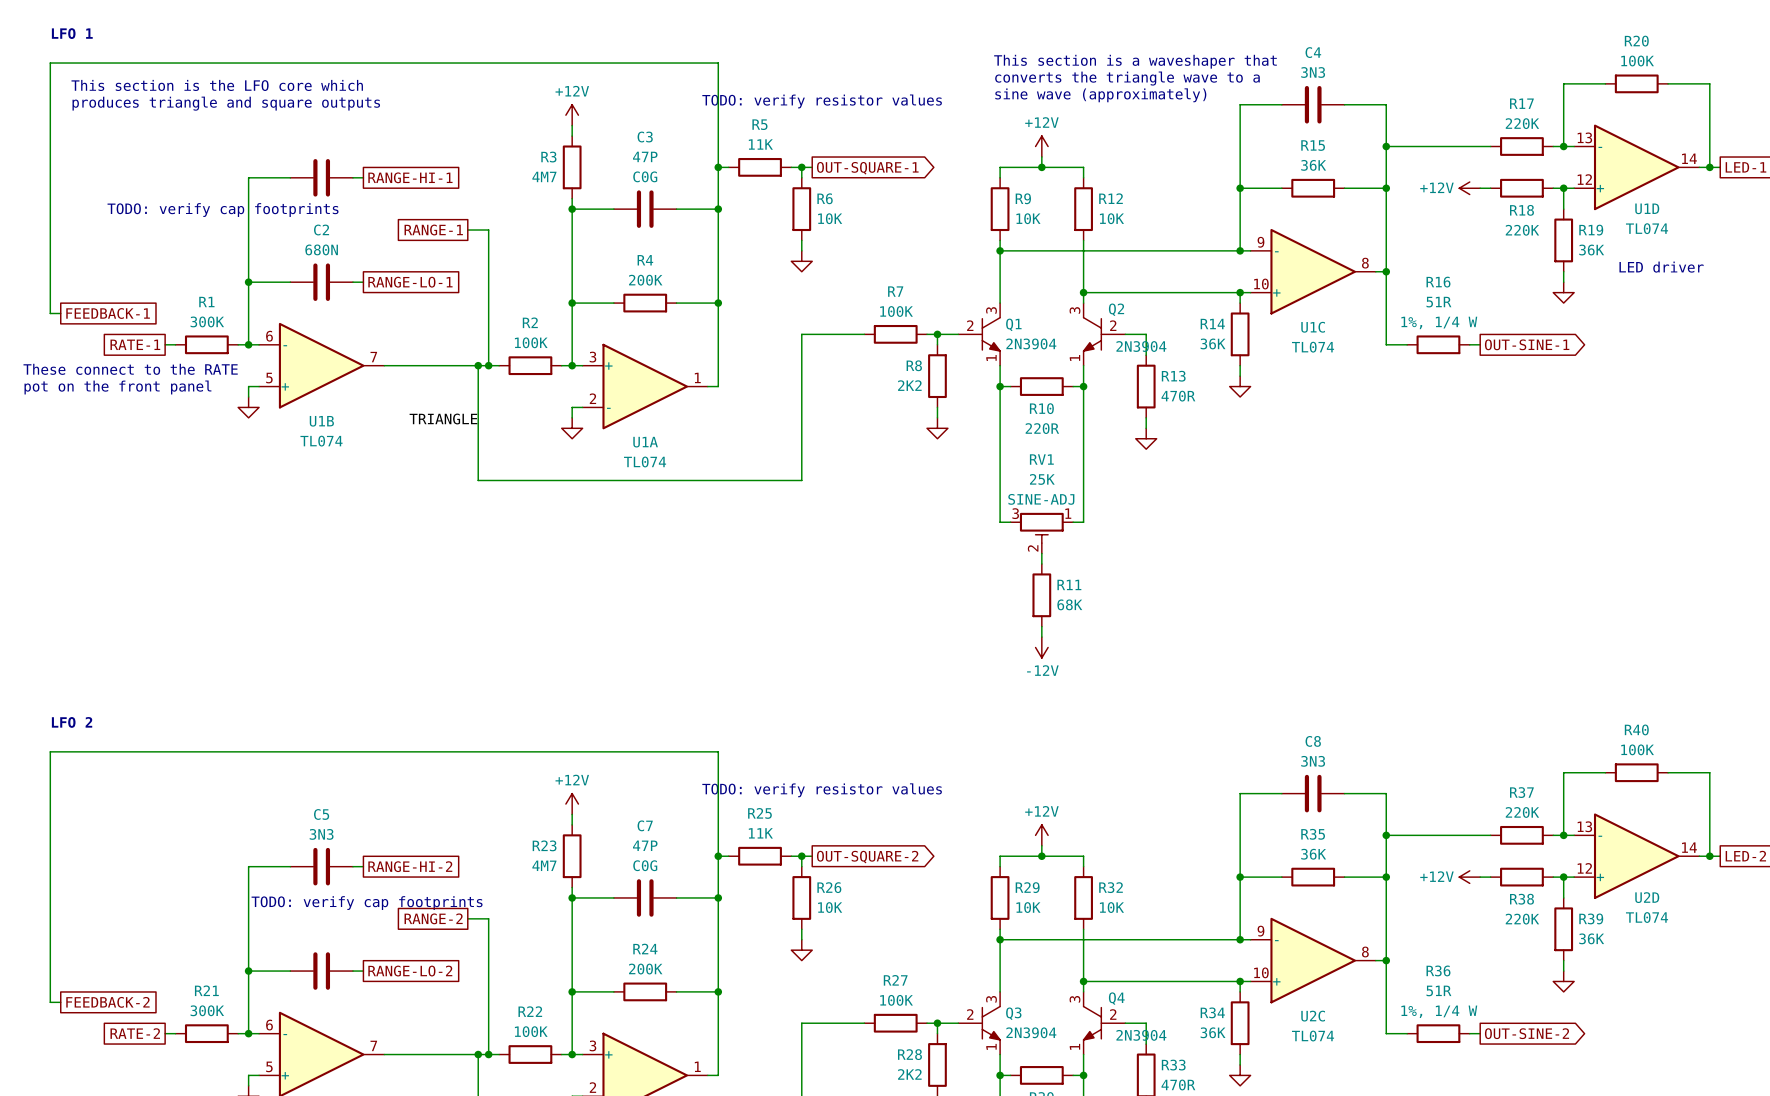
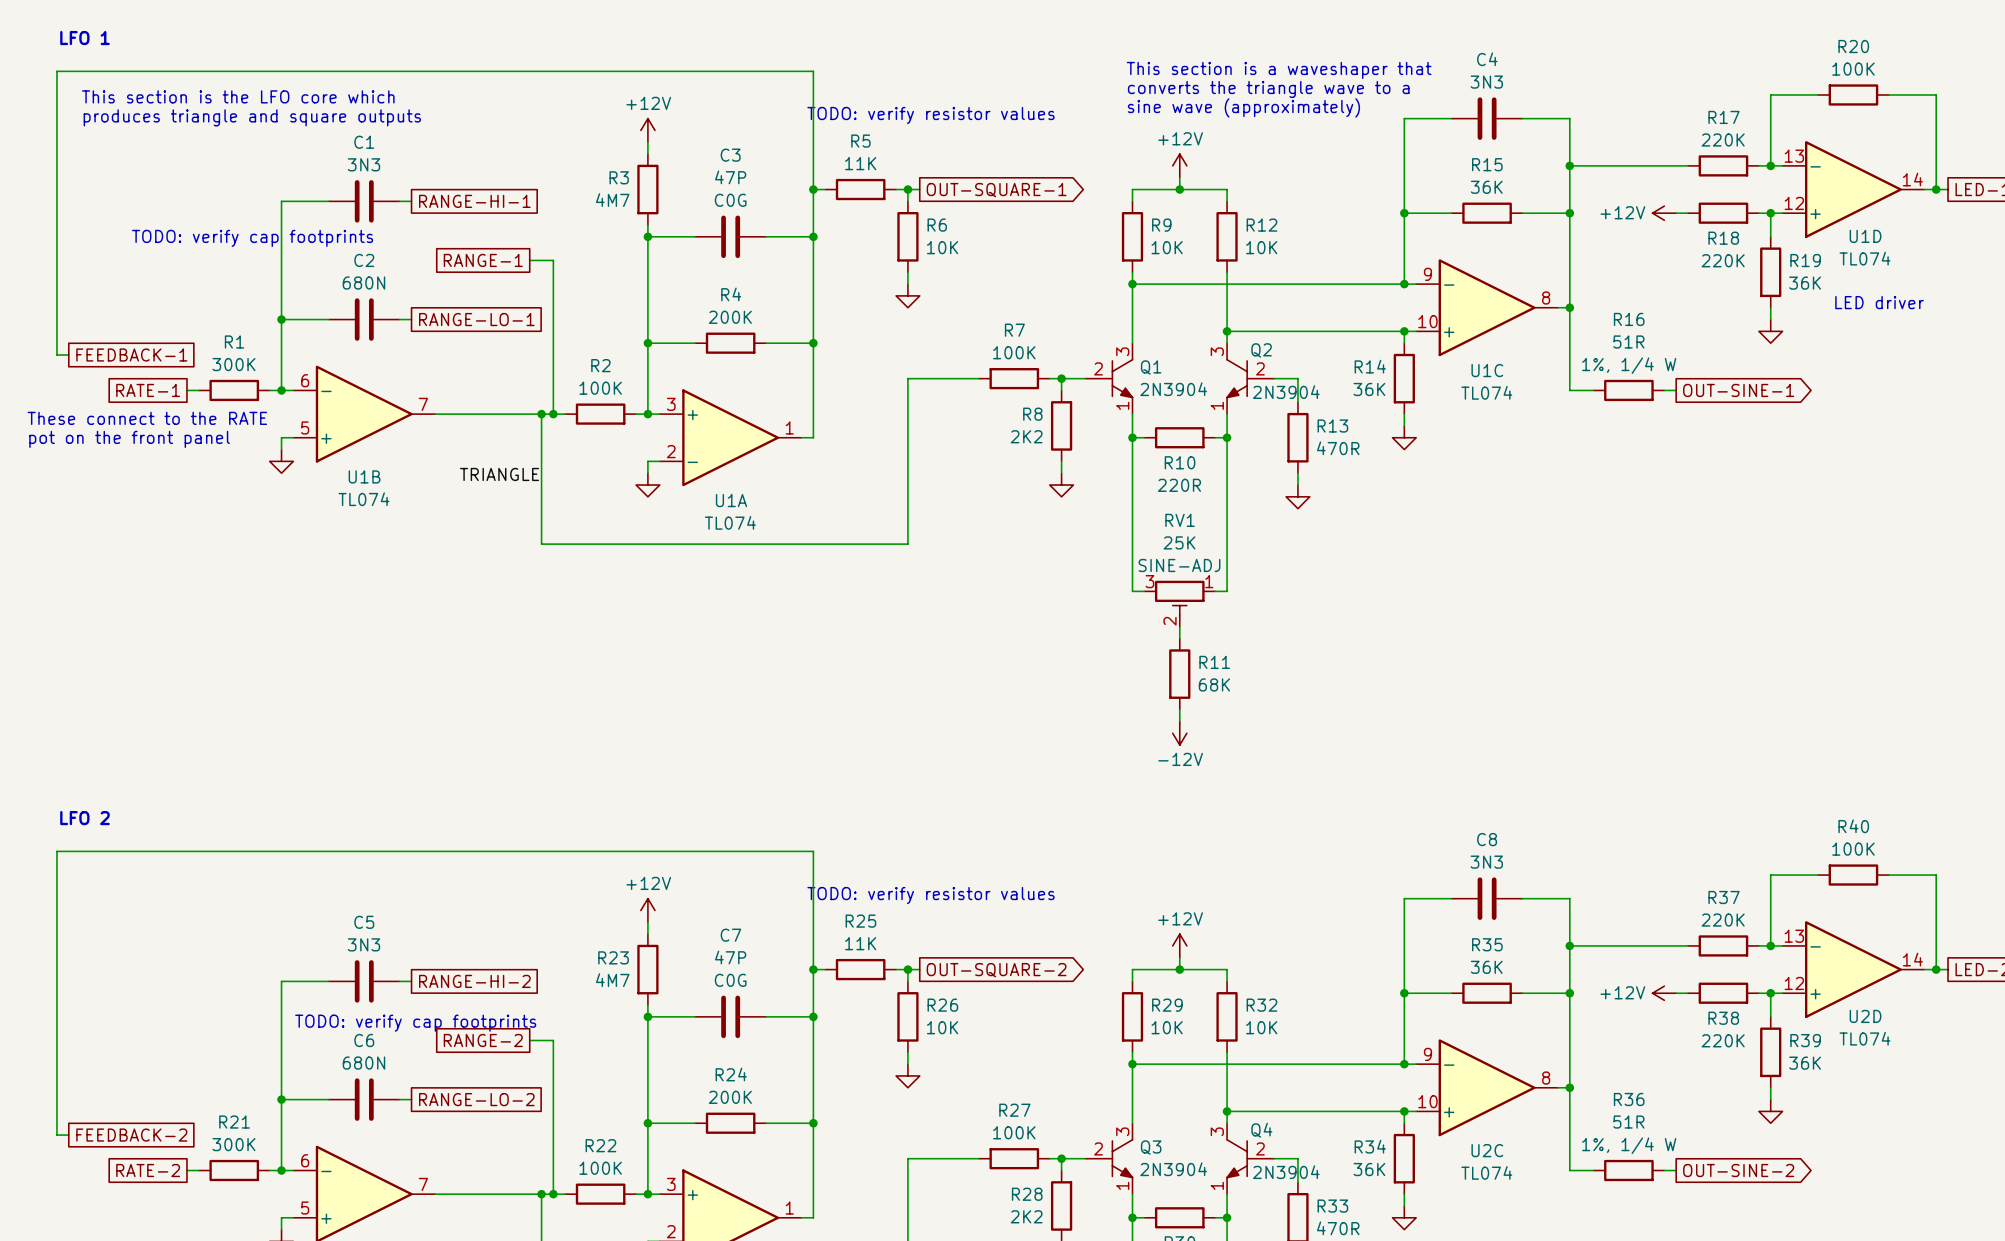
C1 name: none -> C1 (364, 142)
C1 value: none -> 3N3 (363, 164)
C6 name: none -> C6 (364, 1040)
C6 value: none -> 680N (363, 1063)

